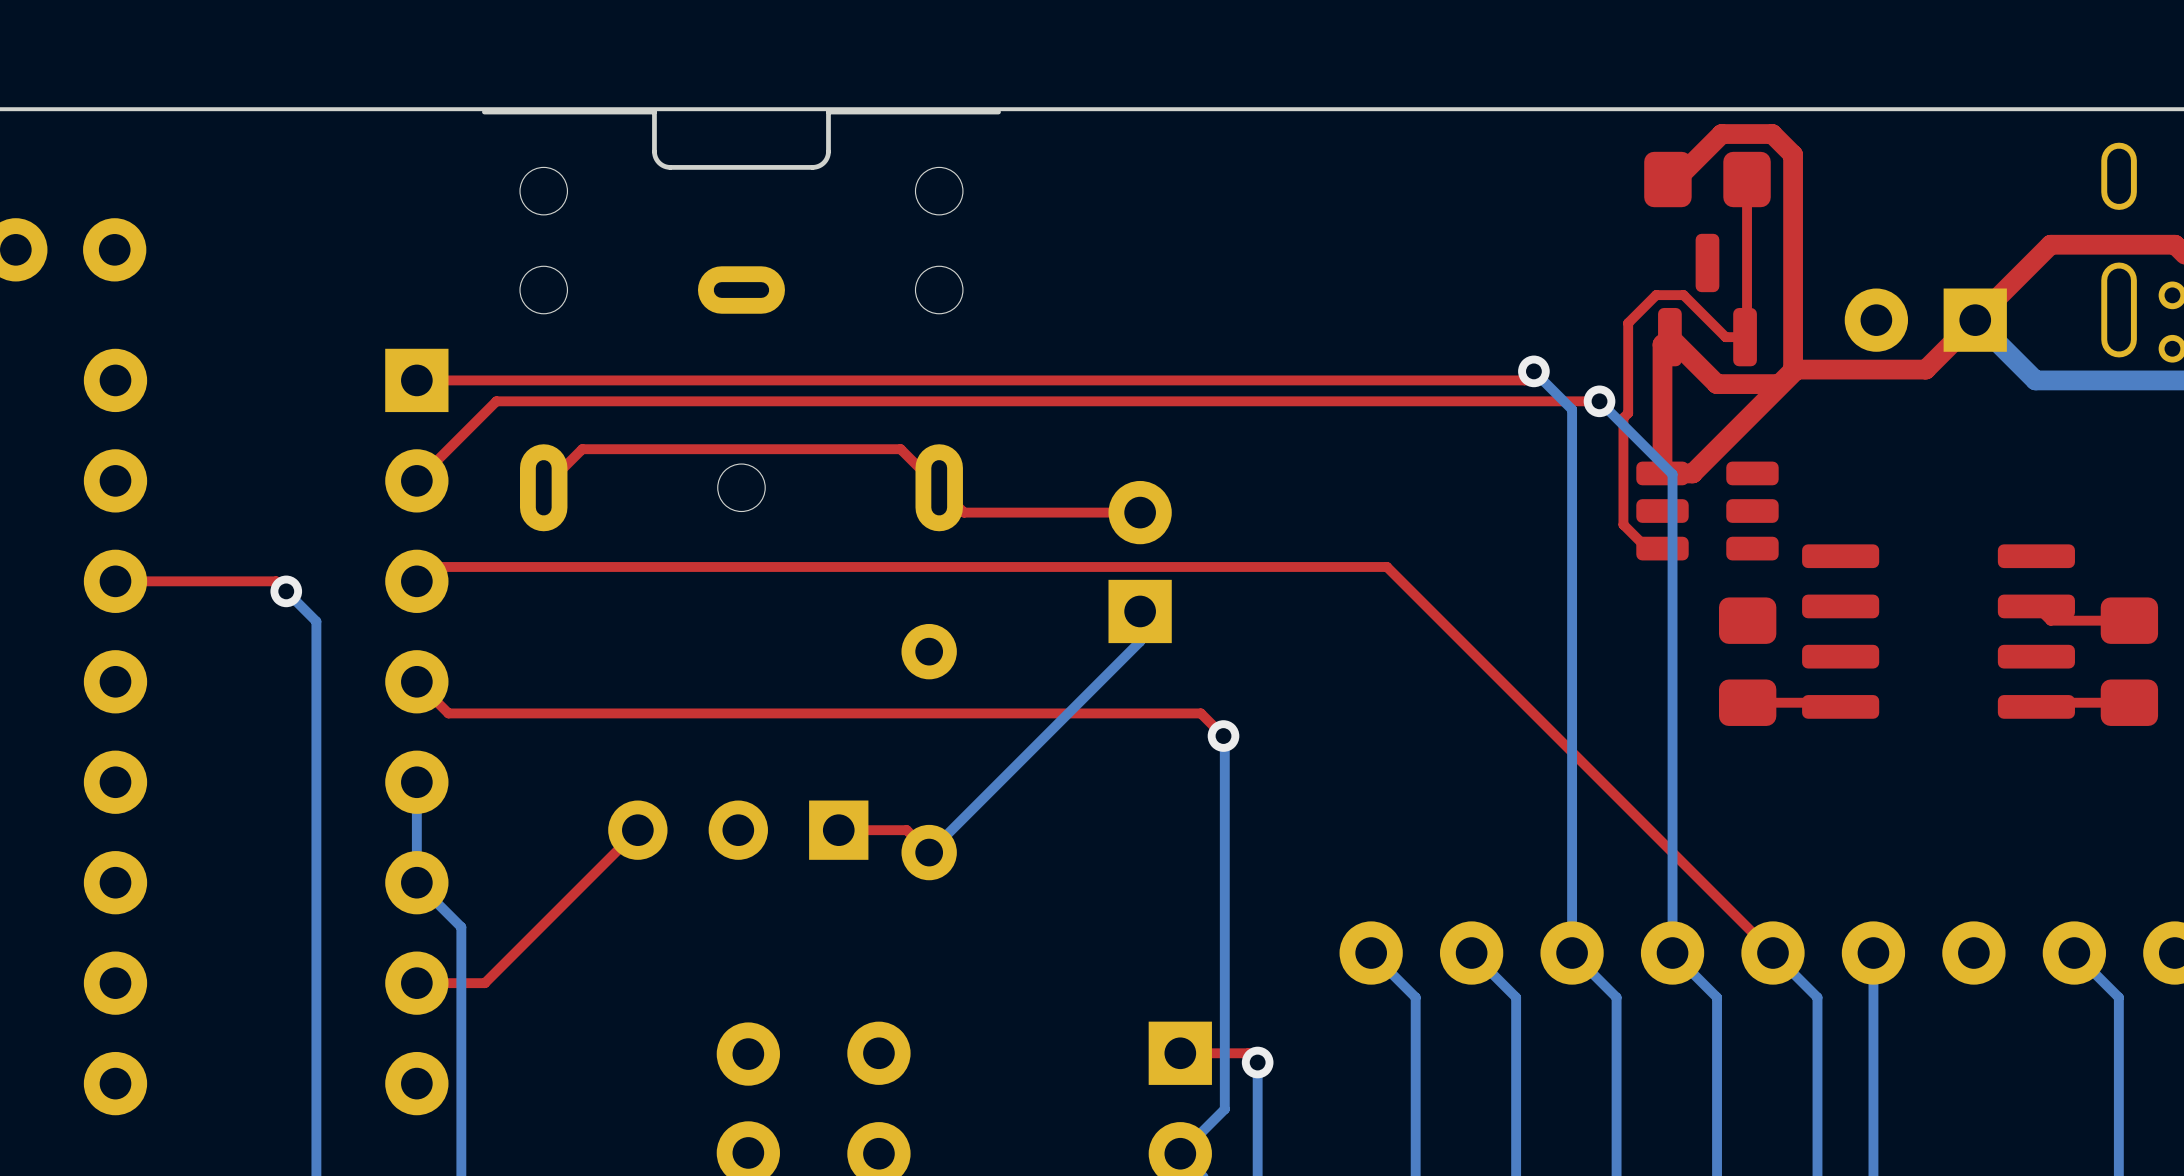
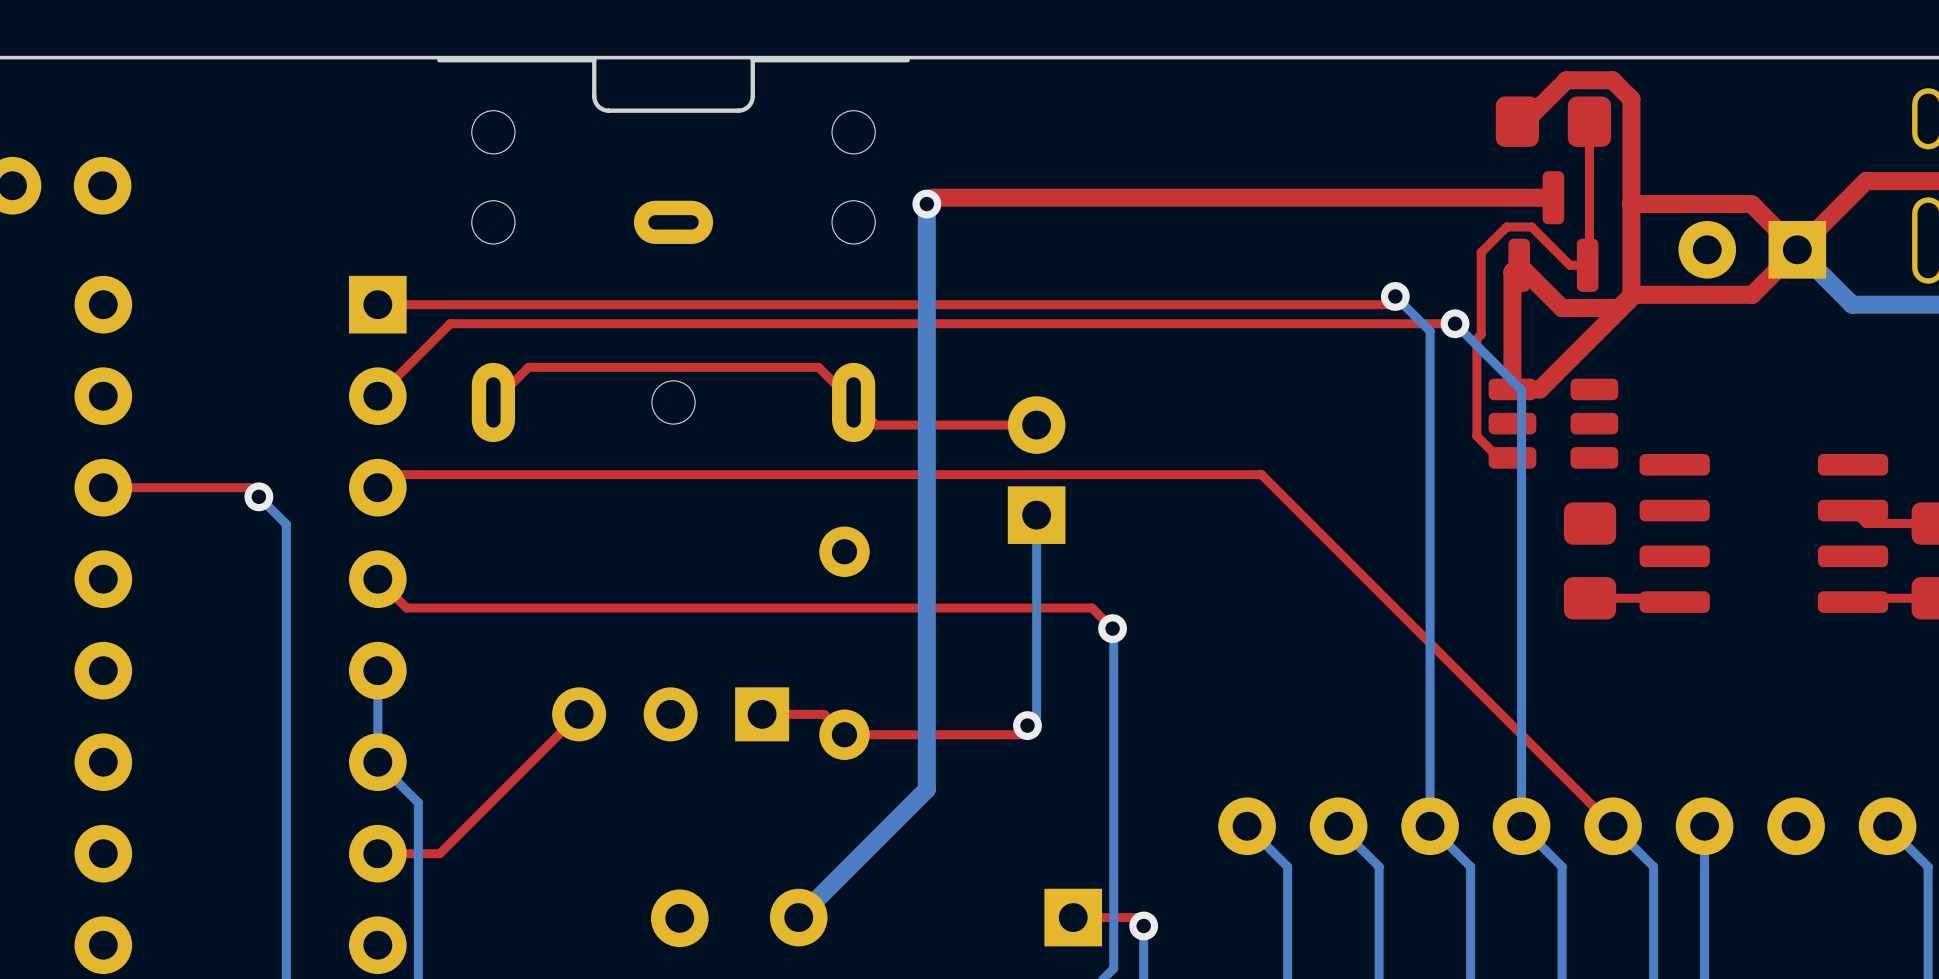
top track: none -> (1553, 197) (933, 197) (926, 204)
bottom track: none -> (926, 204) (926, 789) (798, 917)
via: none -> (926, 204)
top track: none -> (1631, 204) (1751, 204) (1797, 249)
bottom track: (1140, 641) (929, 852) -> (1036, 542) (1036, 716) (1027, 725)
top track: none -> (1027, 725) (1018, 734) (844, 734)
via: none -> (1027, 725)

